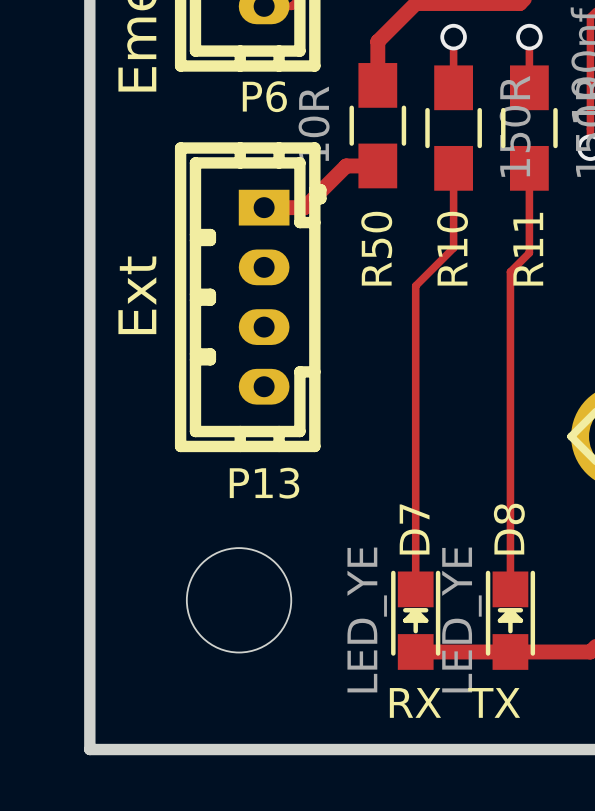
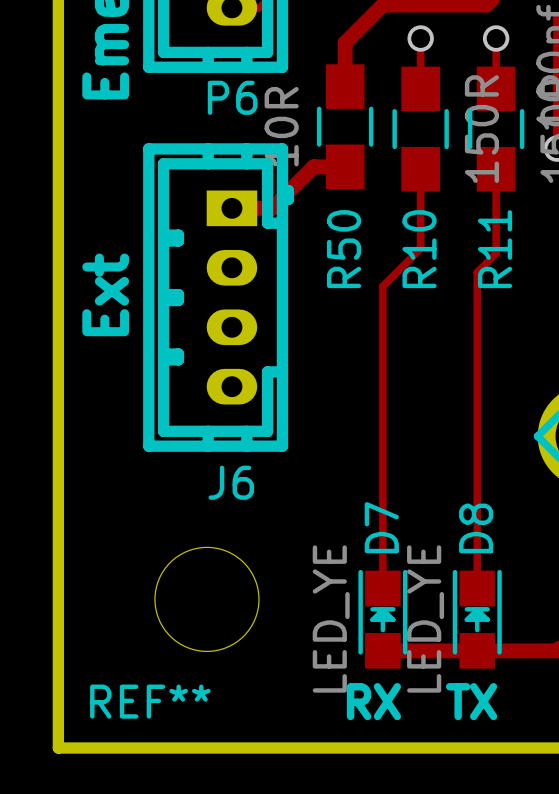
P13 name: P13 (264, 483) -> J6 (231, 482)
REF** name: none -> REF** (150, 701)

